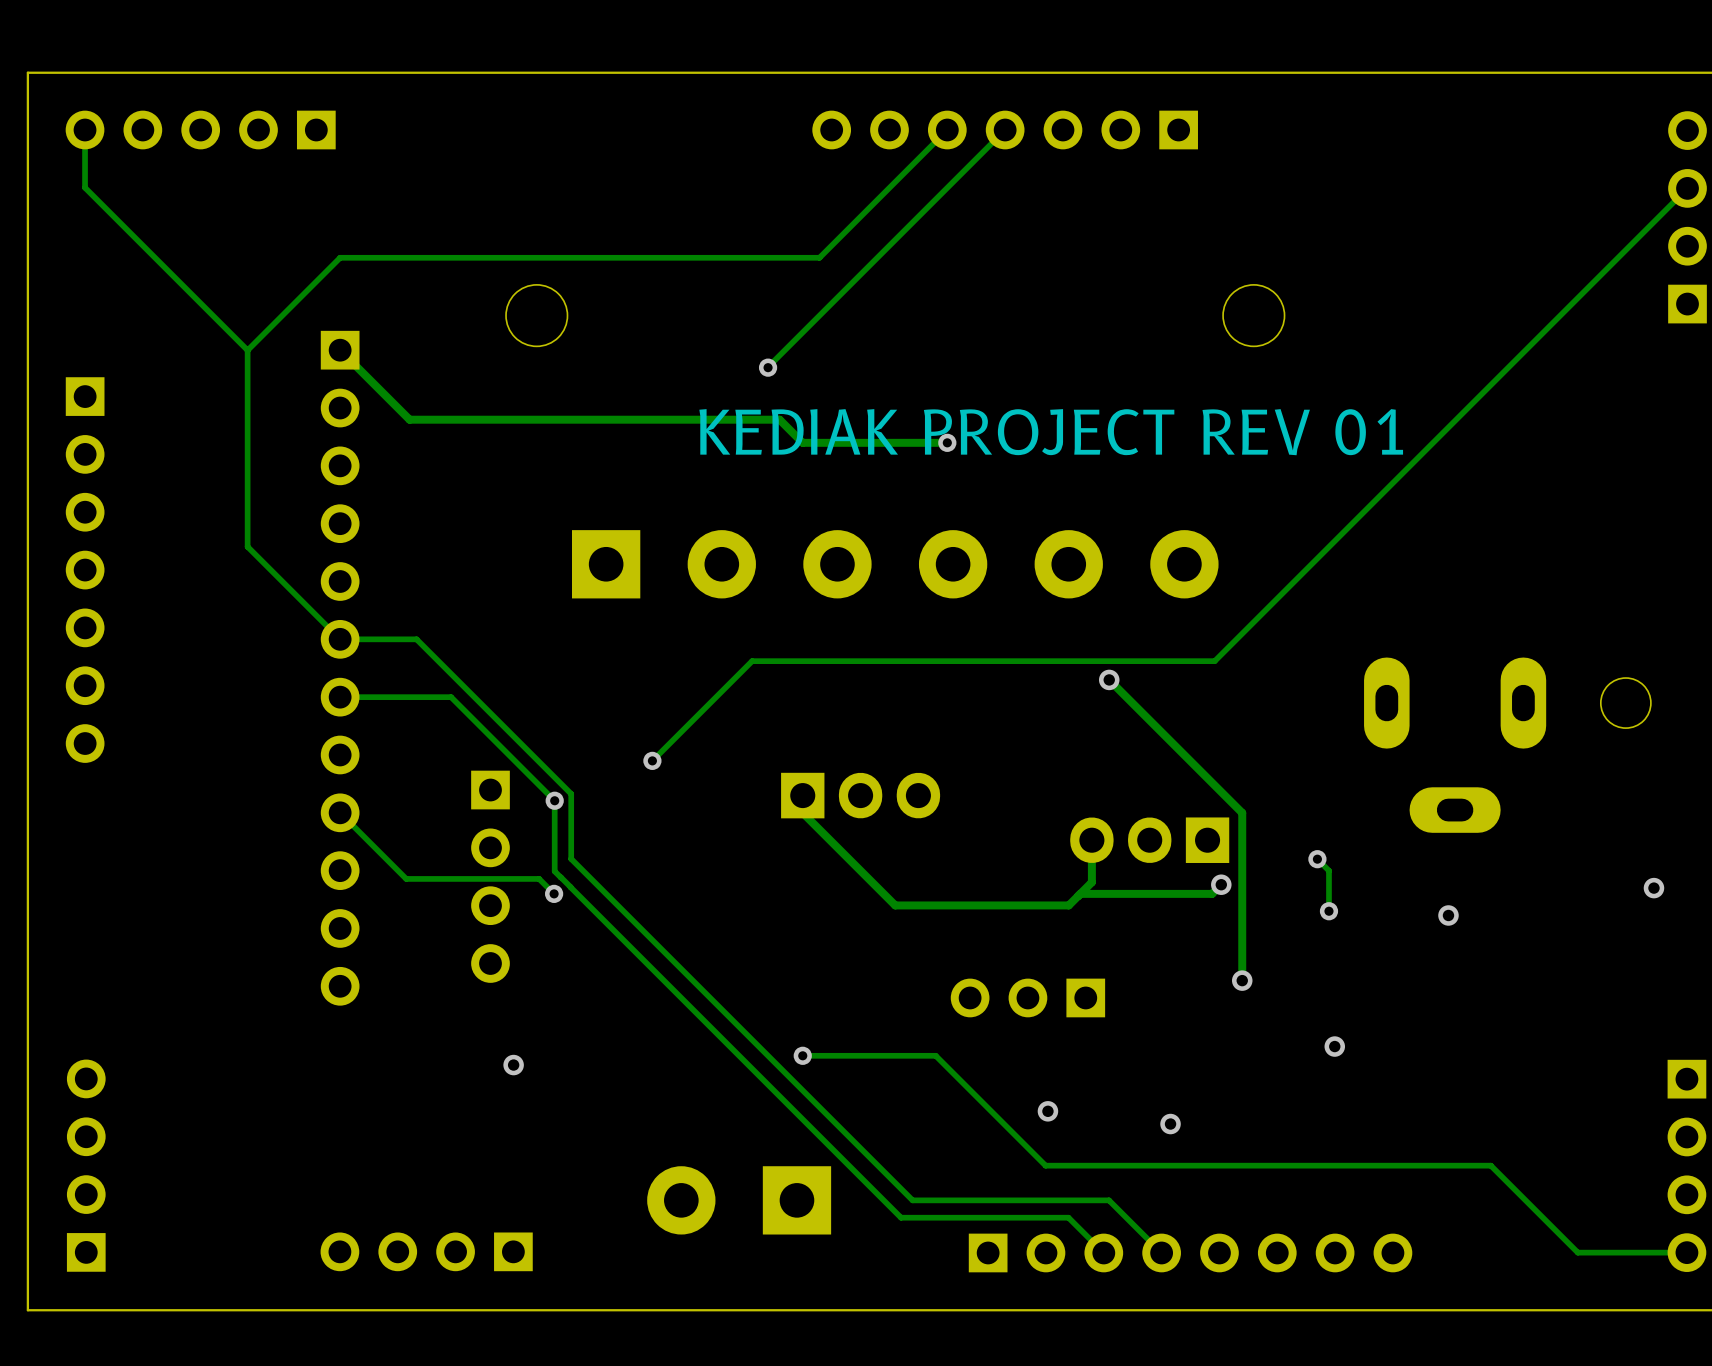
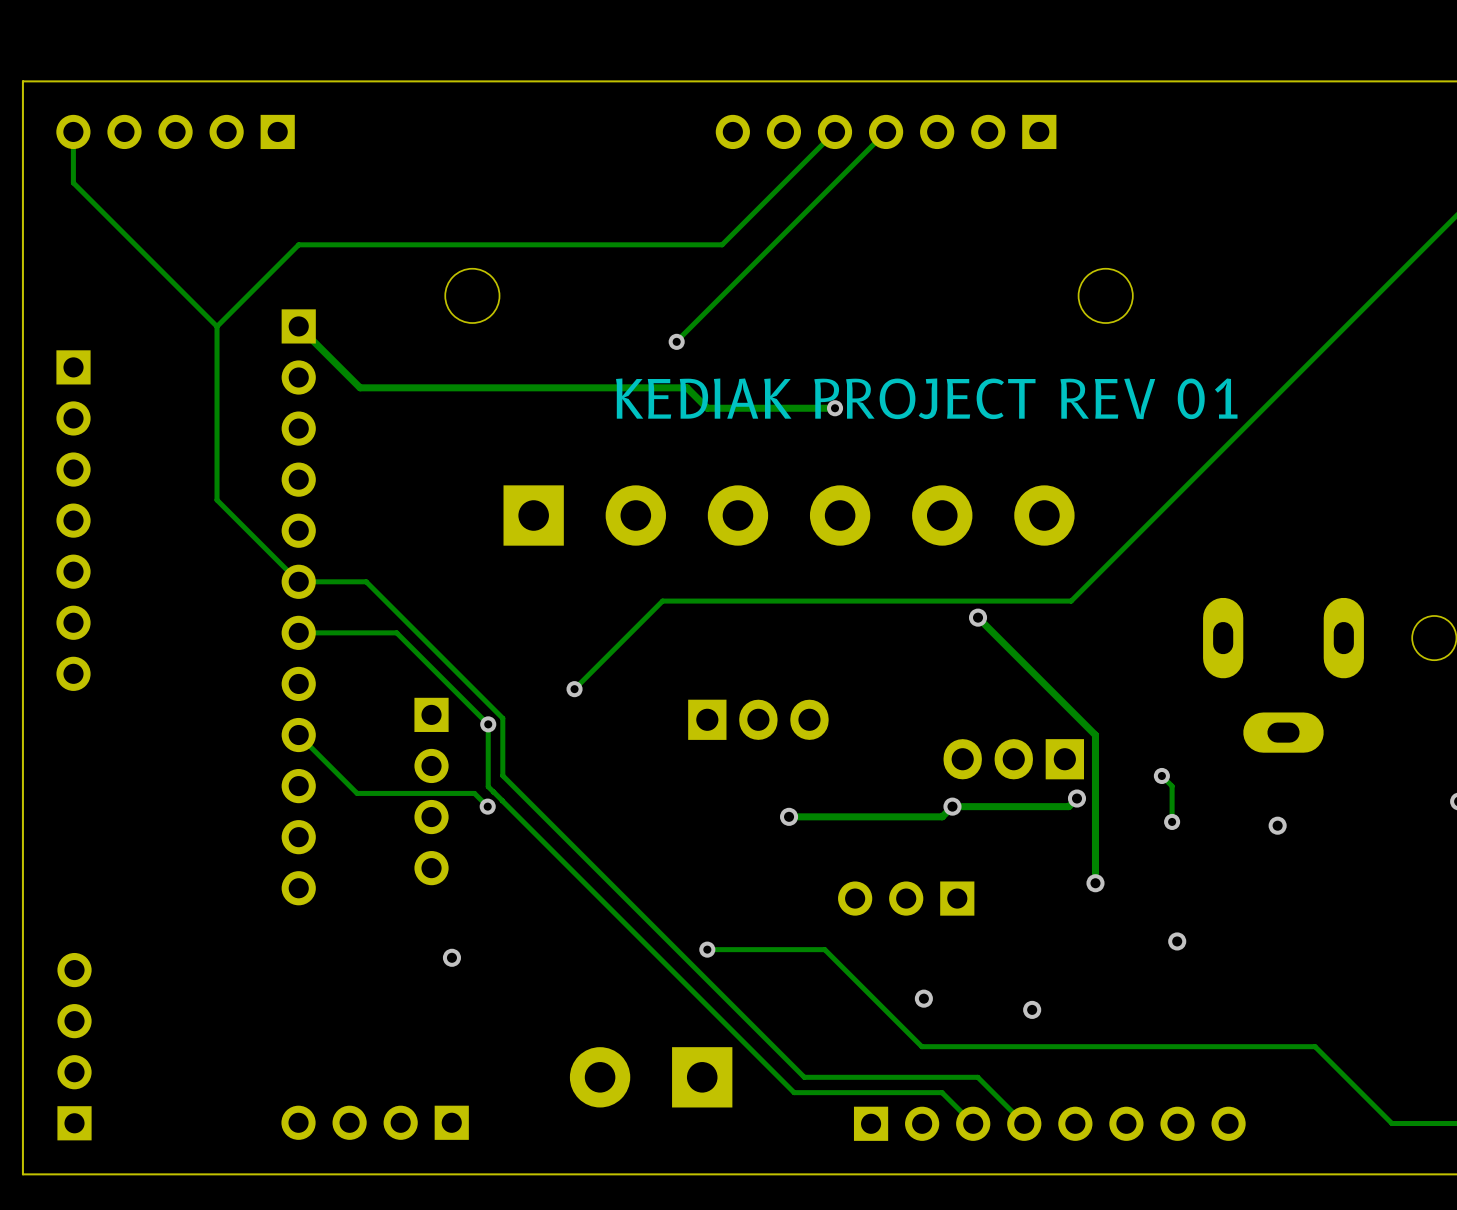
track: (802, 795) (802, 812) (895, 905) -> none
track: (1091, 840) (1091, 882) (1080, 893) -> none
via: none -> (952, 806)
via: none -> (789, 816)

